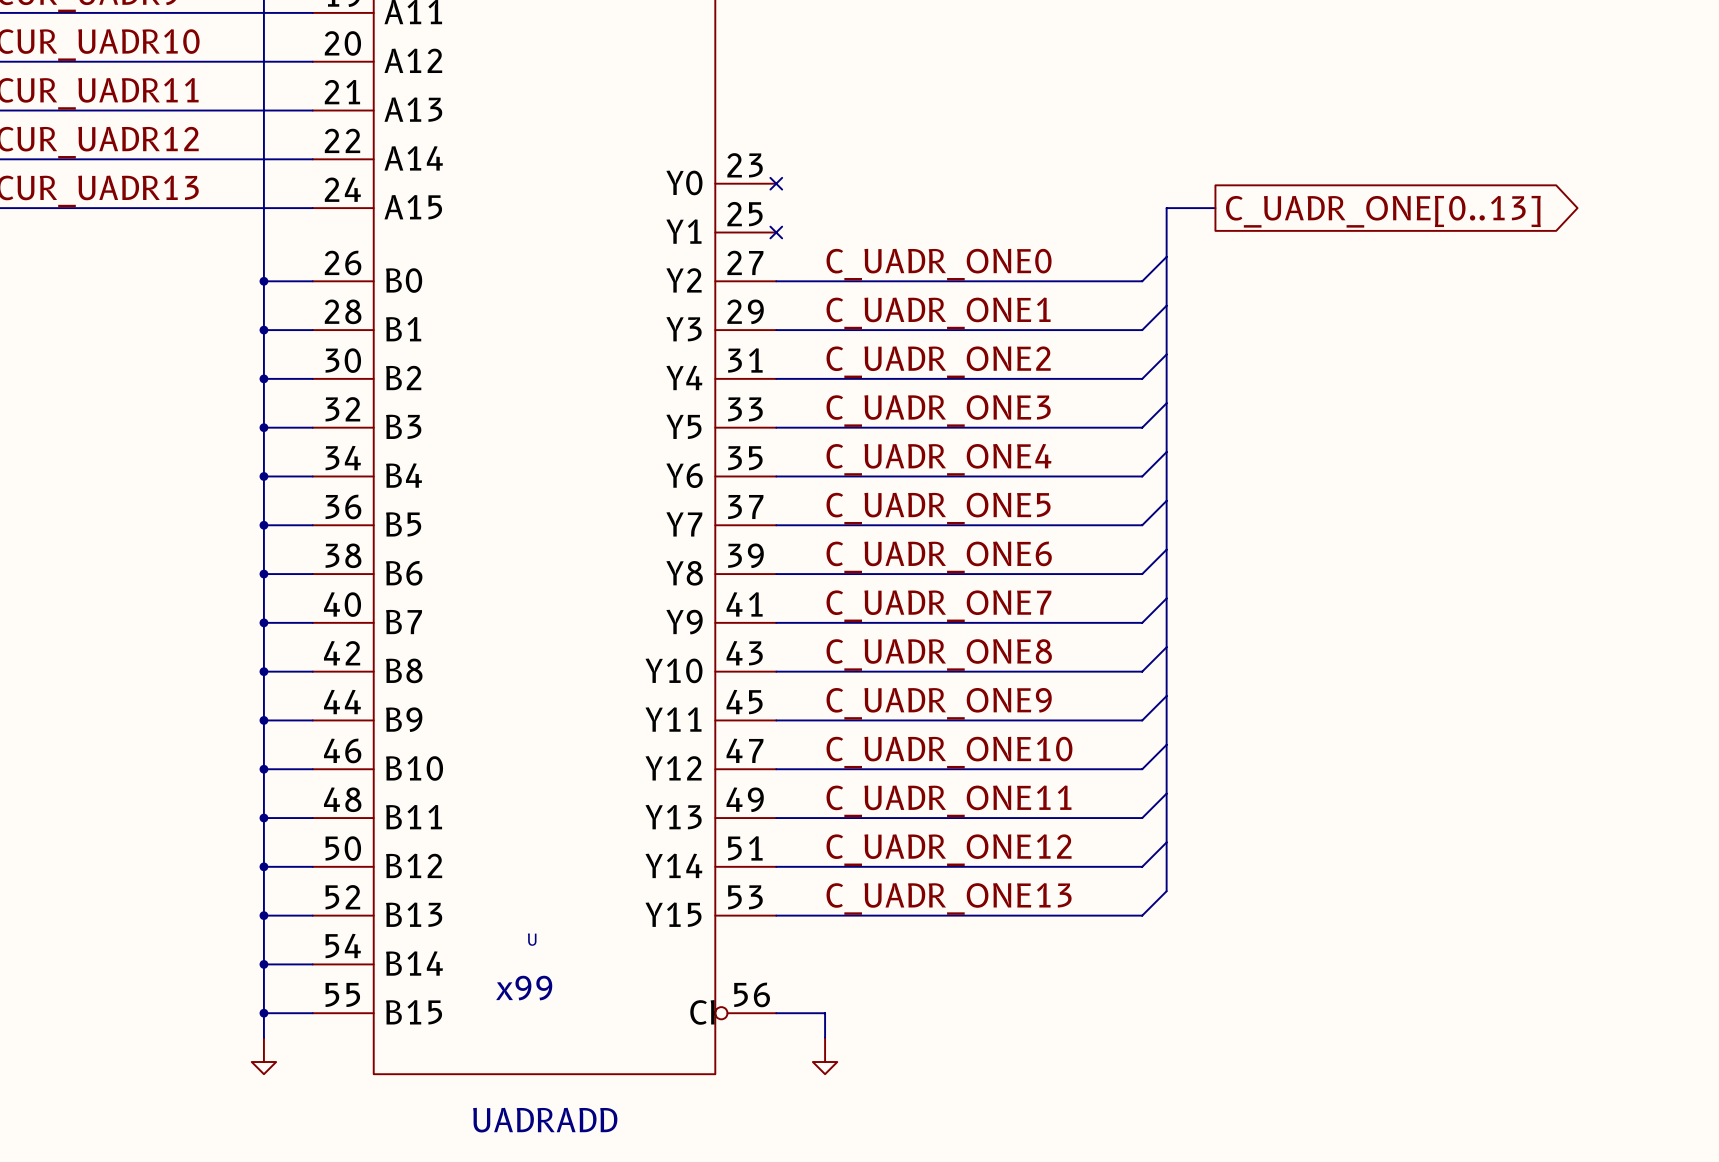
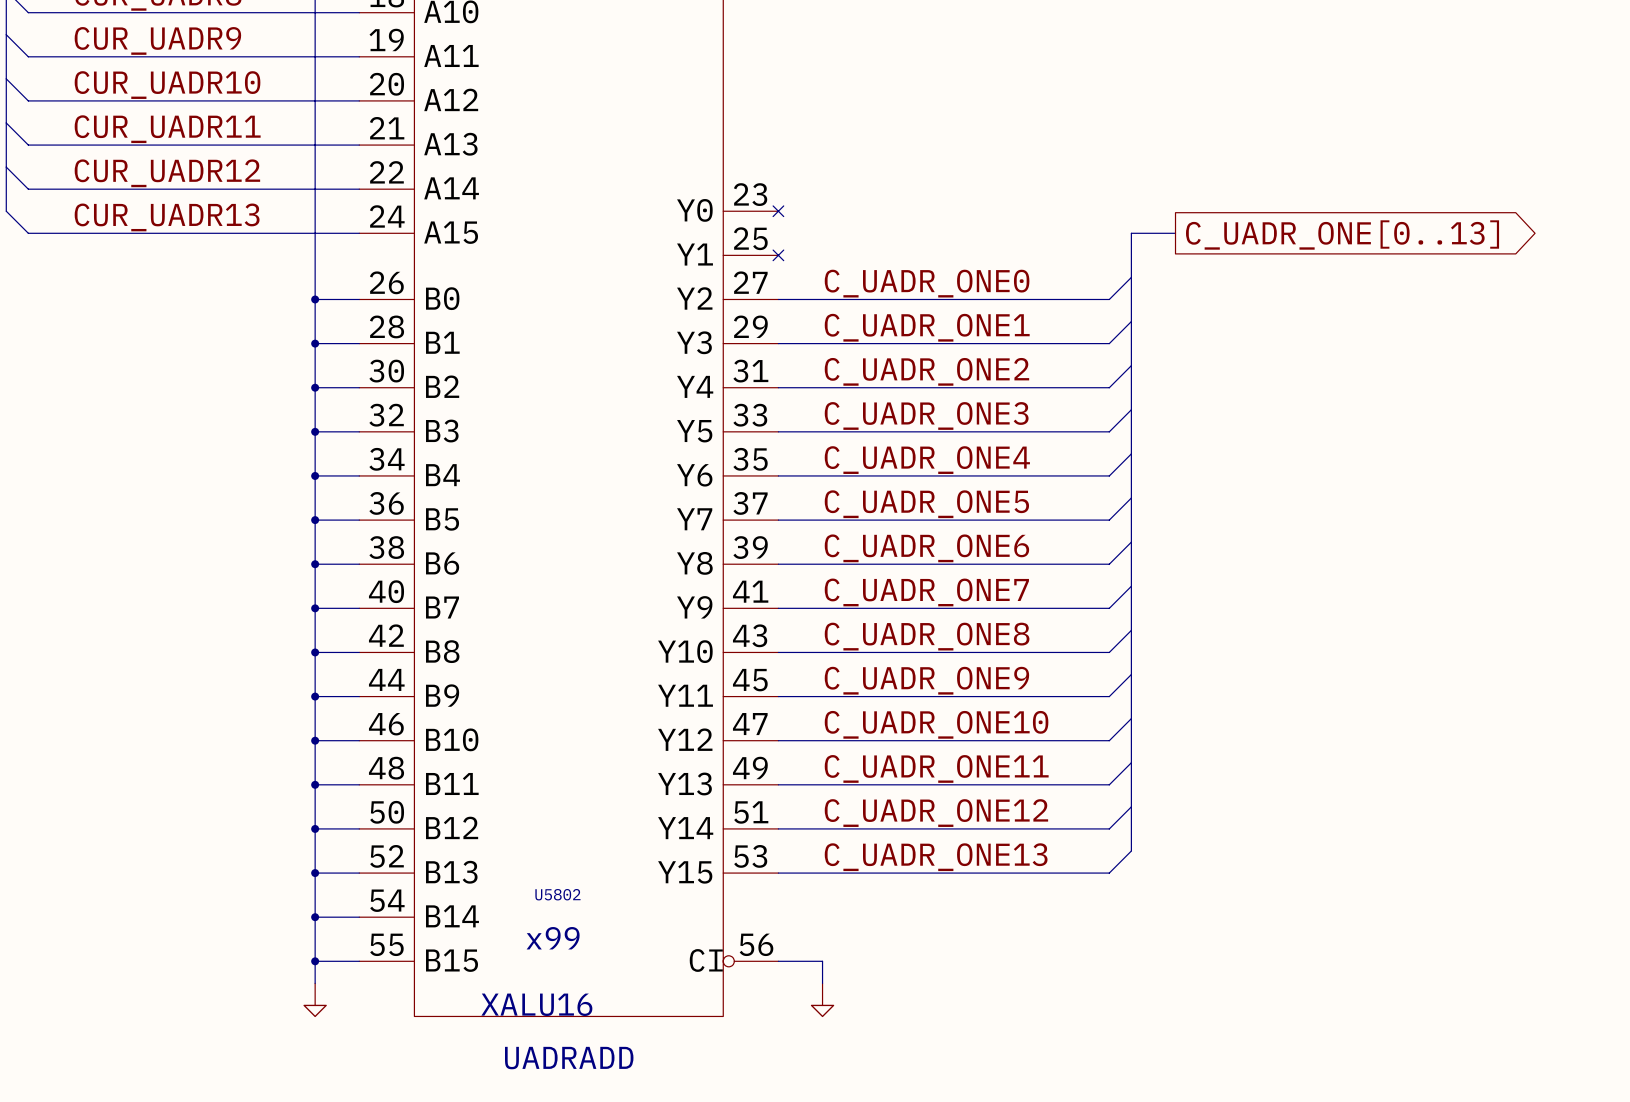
U name: U (532, 939) -> U5802 (557, 894)
U value: none -> XALU16 (536, 1004)

